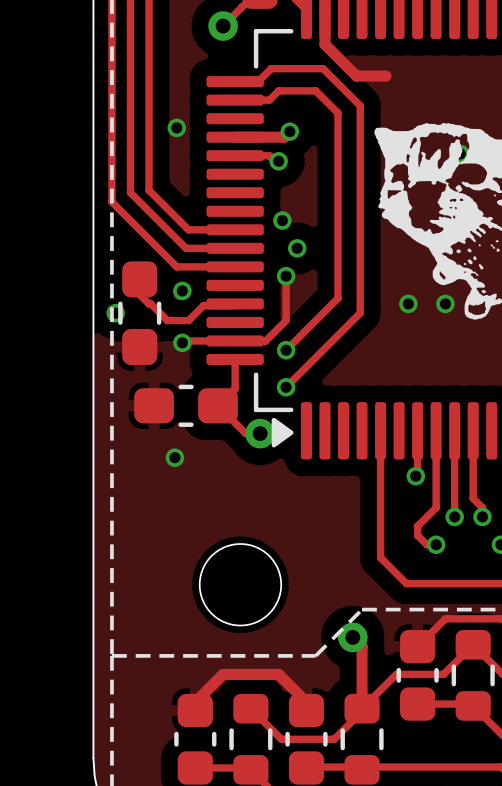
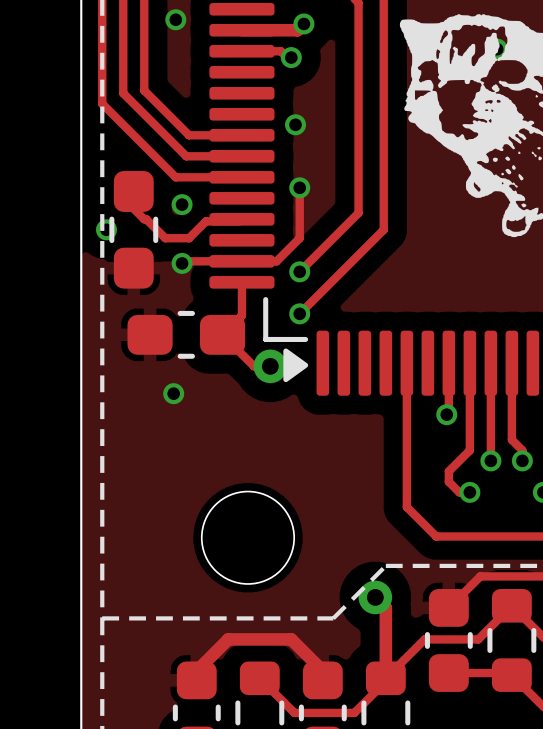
via: (297, 248) -> none
via: (408, 303) -> none
via: (445, 303) -> none

